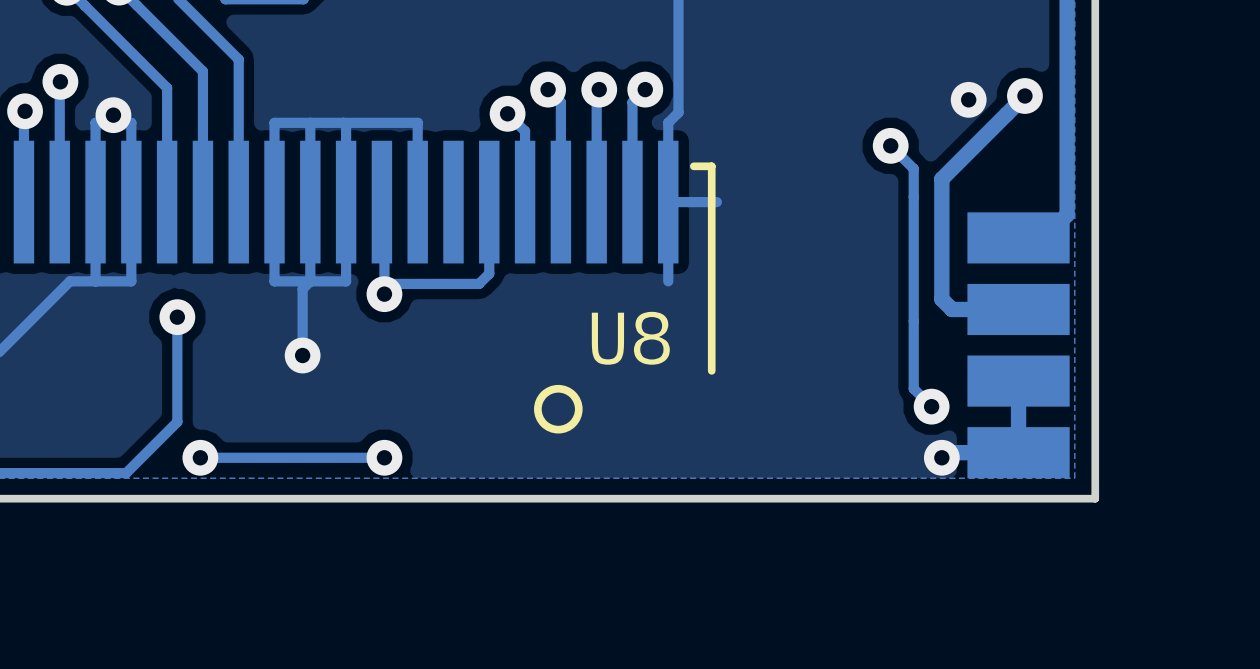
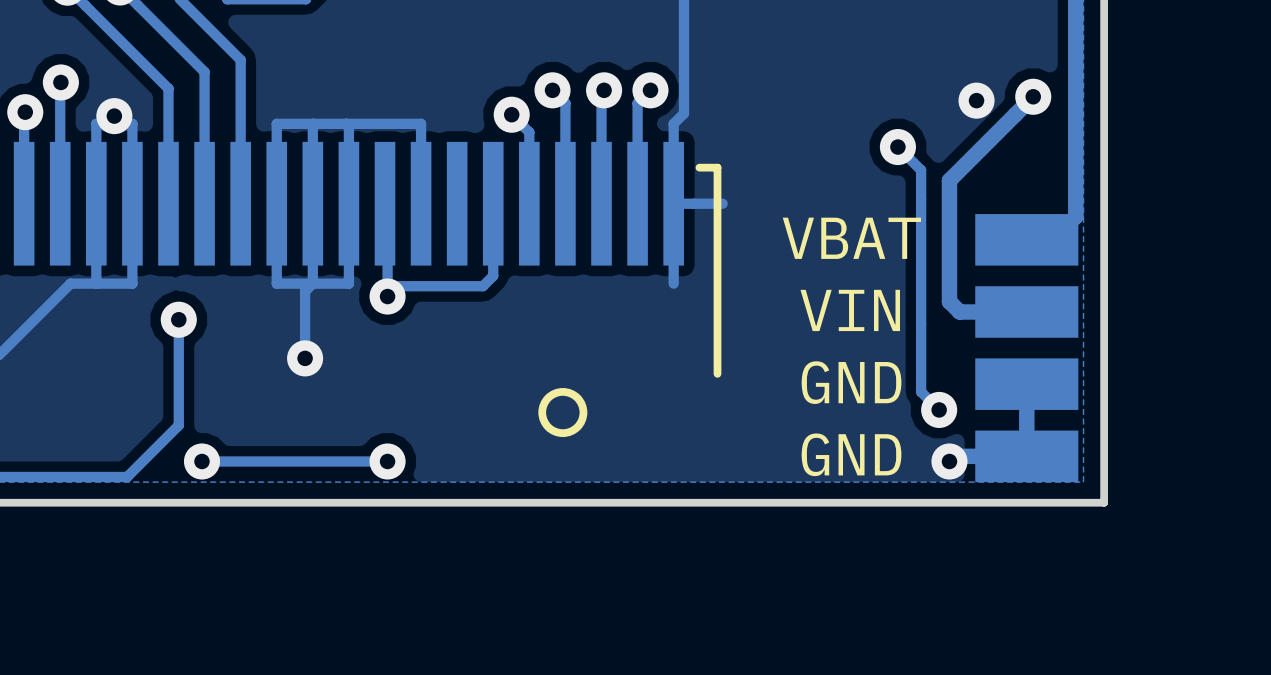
text: none -> VBAT (851, 238)
text: none -> VIN (850, 310)
U8 name: U8 (630, 338) -> none
text: none -> GND (851, 382)
text: none -> GND (851, 454)

